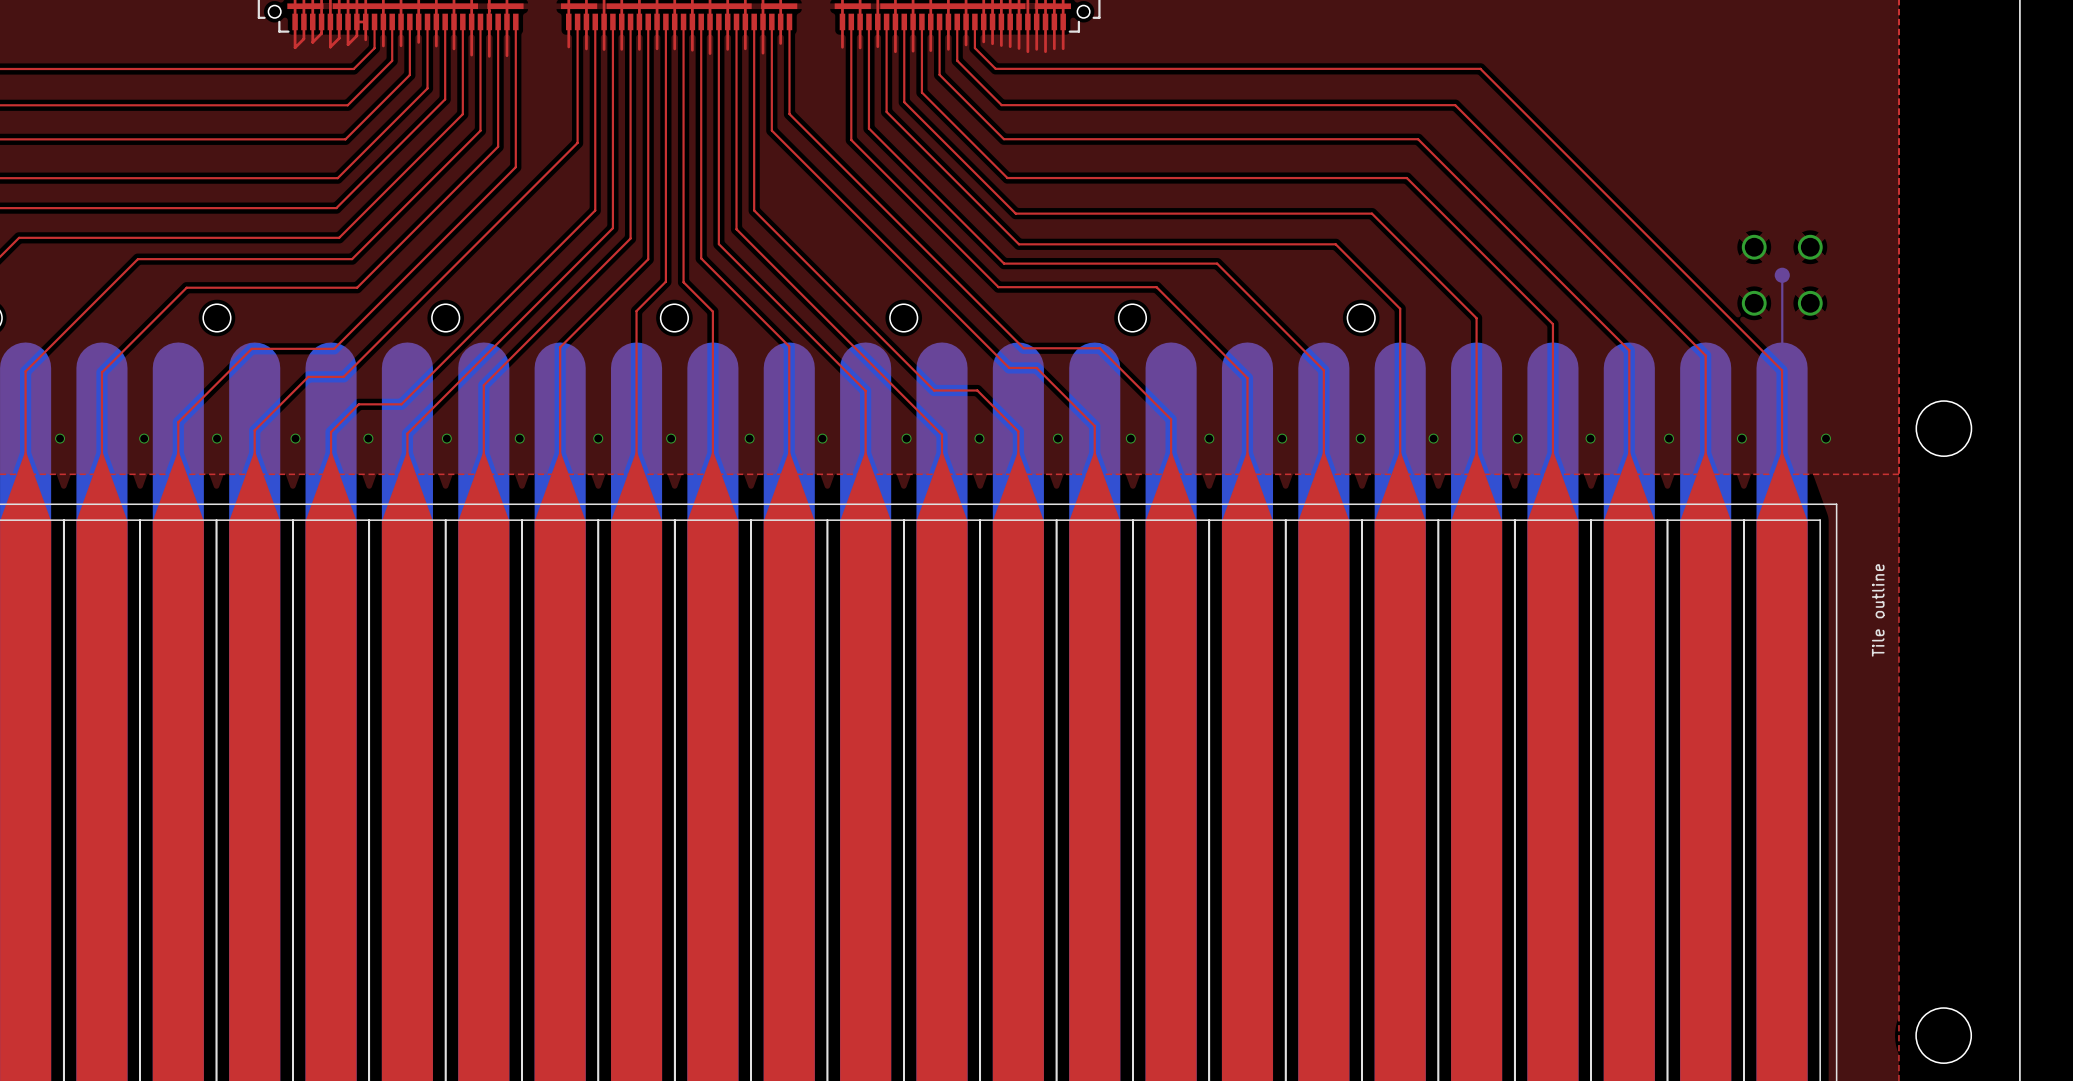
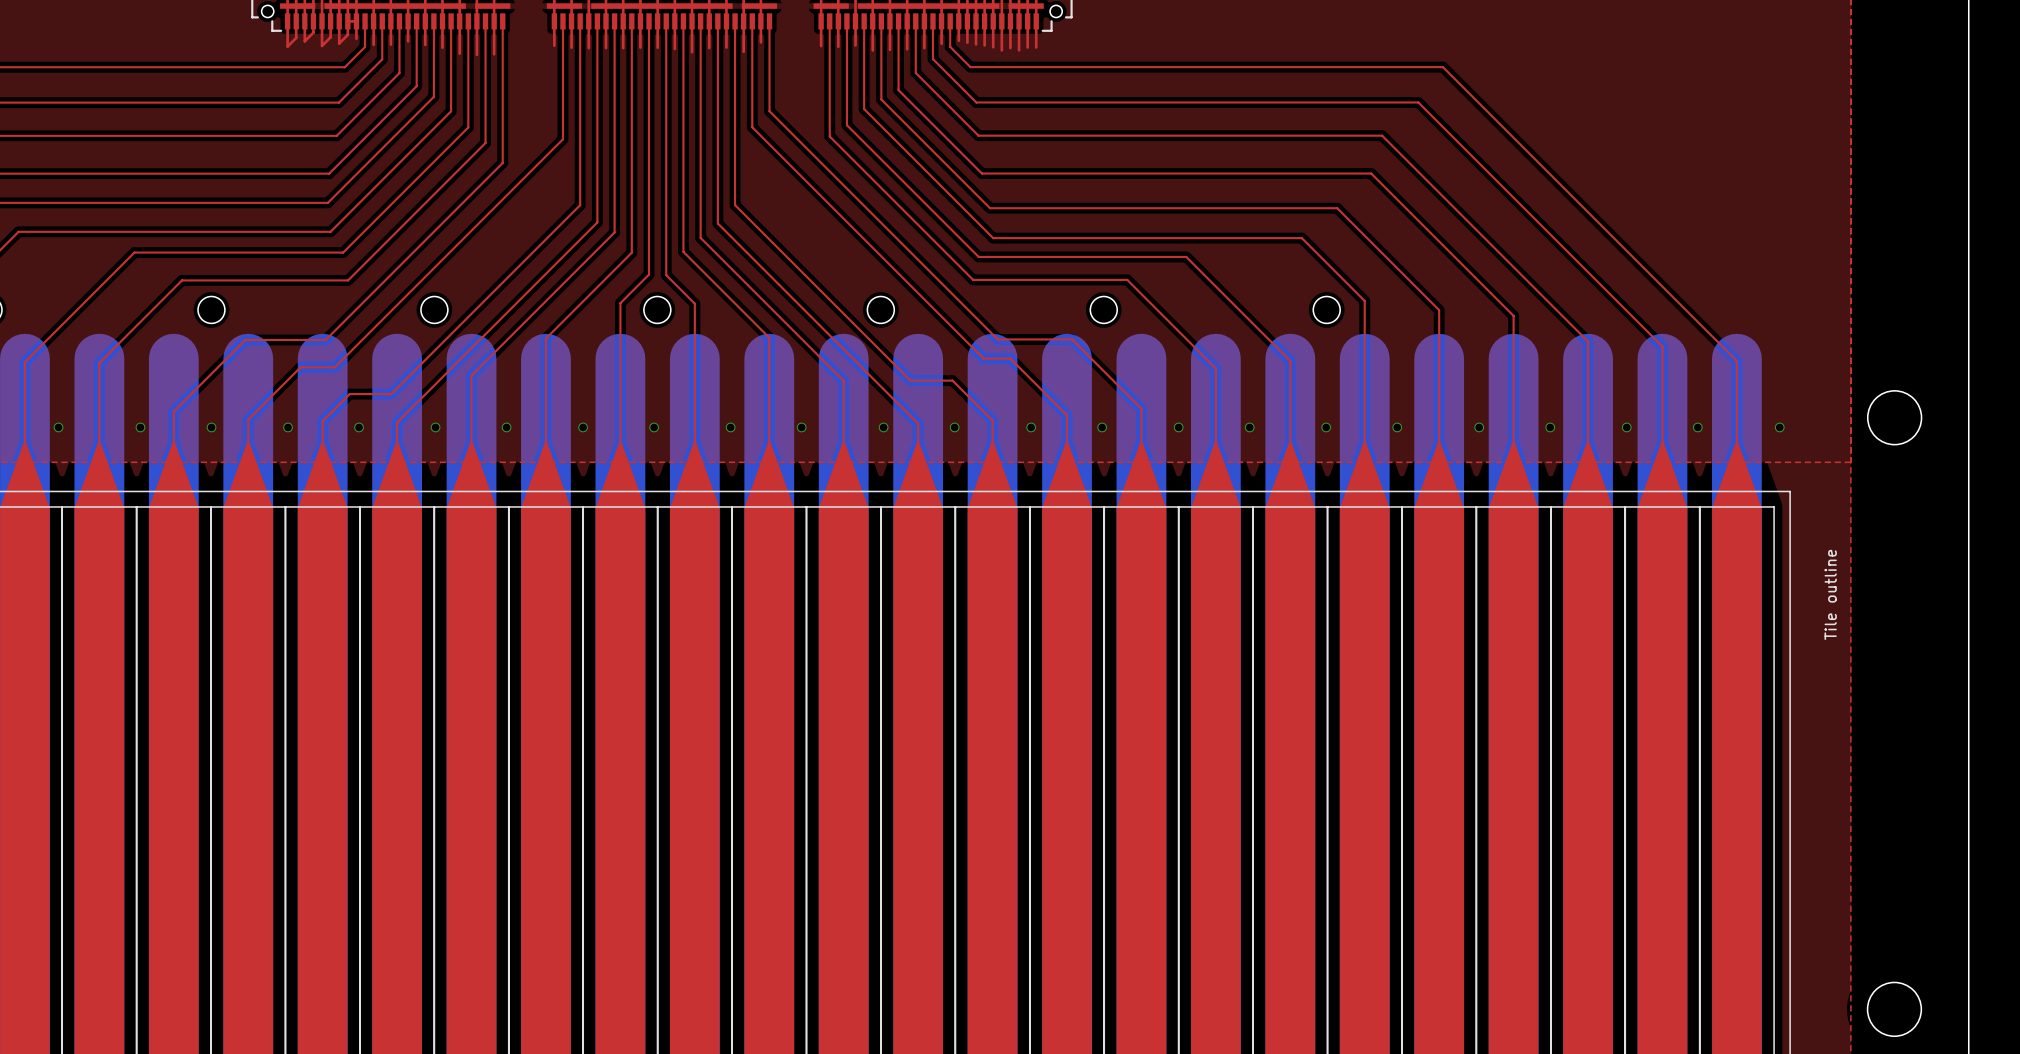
part: (1782, 275) -> none
bottom track: (1782, 281) (1782, 368) -> none

